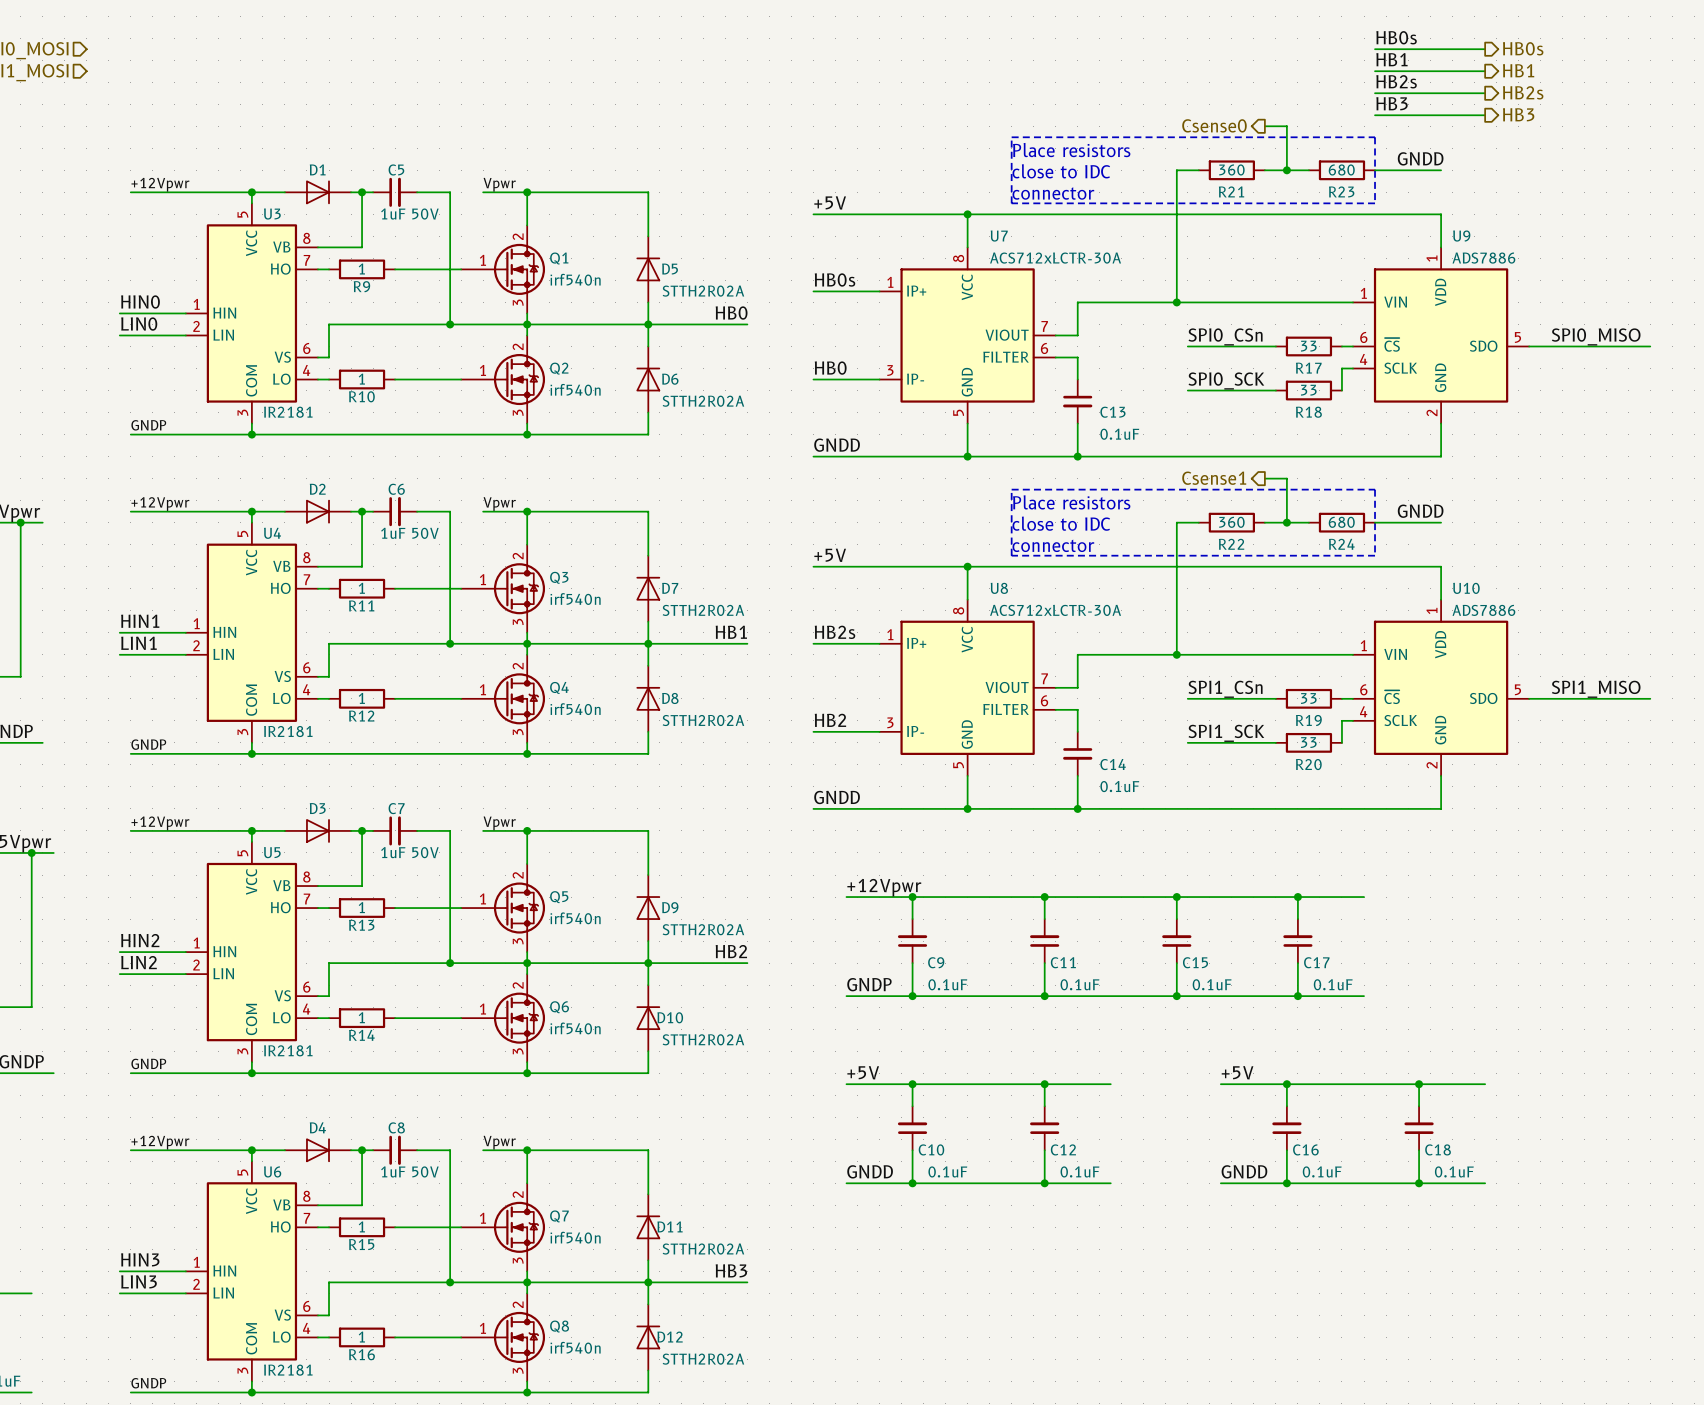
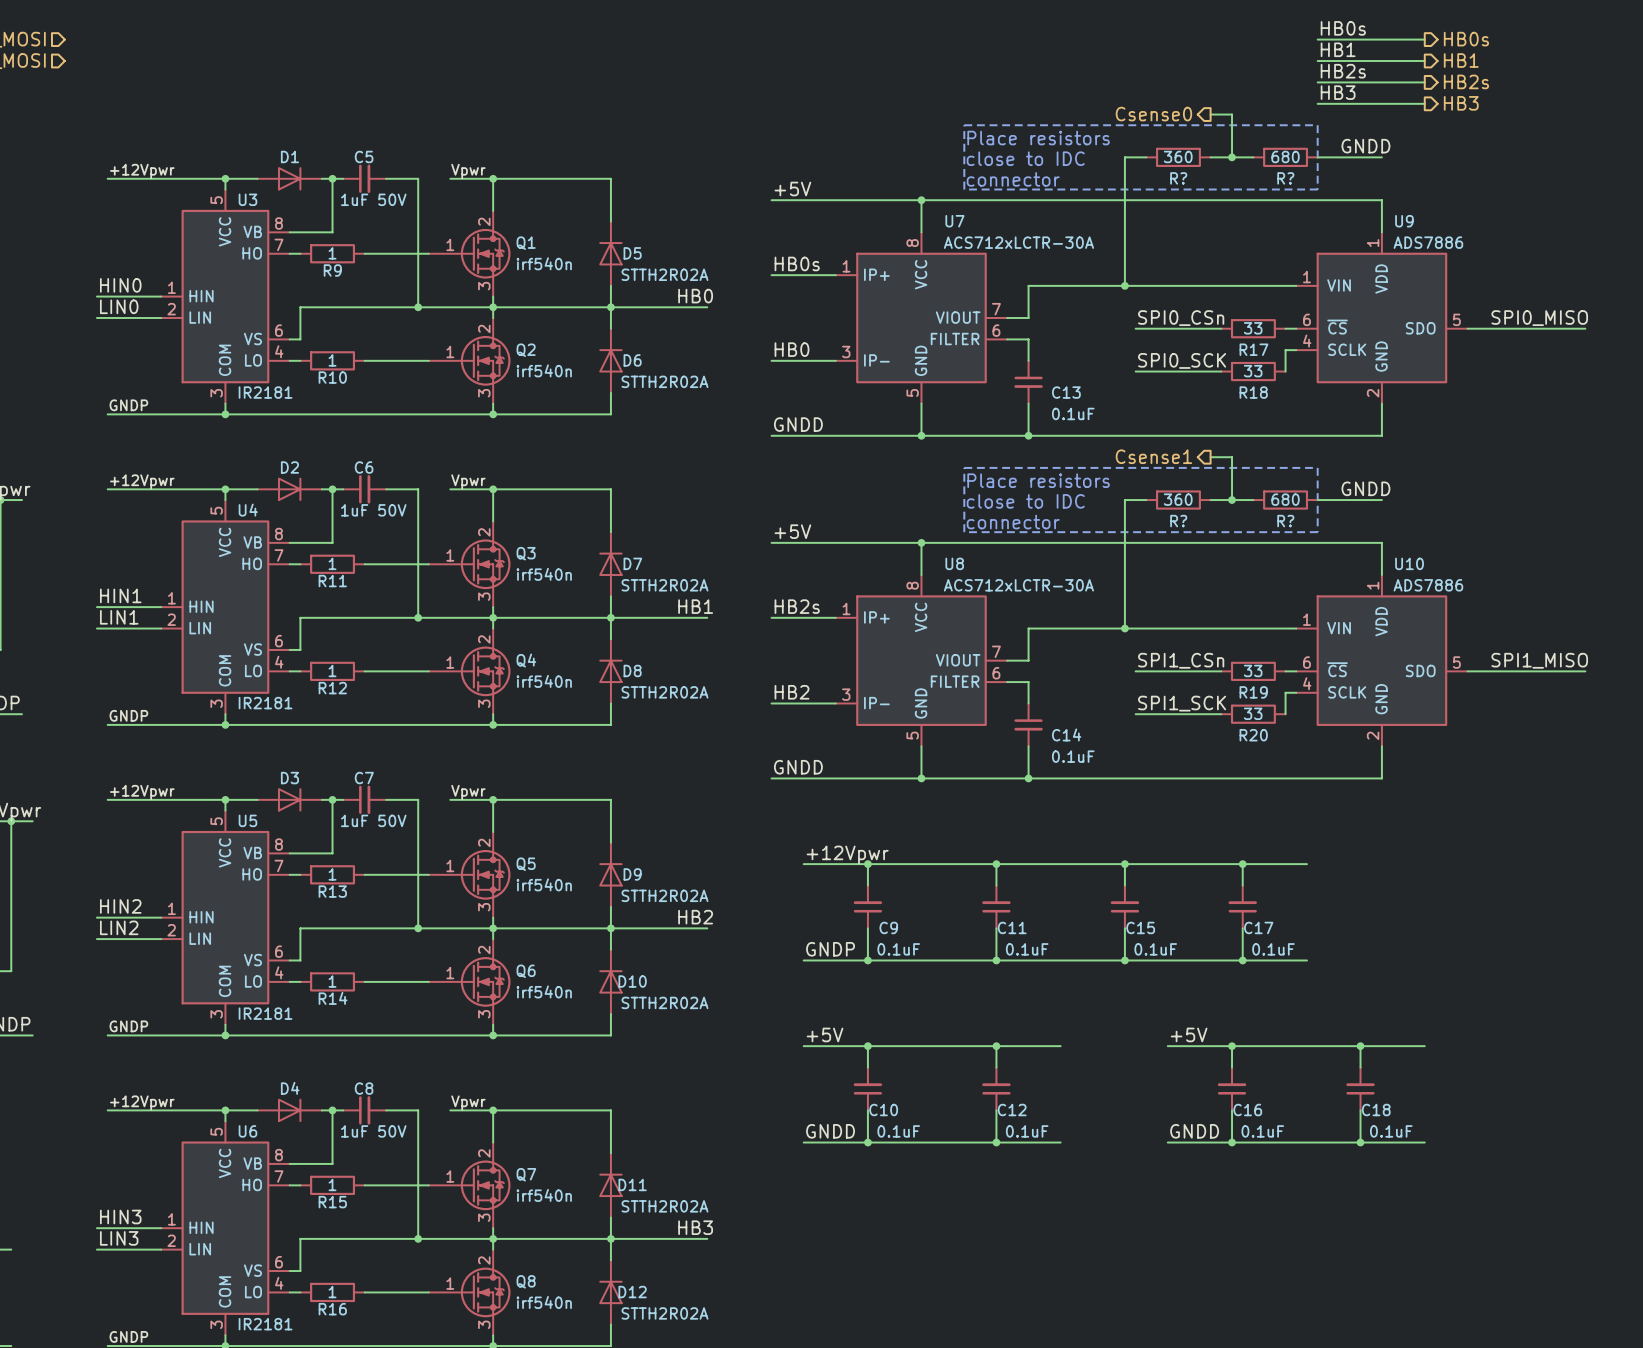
R21 name: R21 (1231, 191) -> R? (1178, 178)
R23 name: R23 (1341, 191) -> R? (1285, 178)
R22 name: R22 (1231, 544) -> R? (1178, 521)
R24 name: R24 (1341, 544) -> R? (1285, 521)

